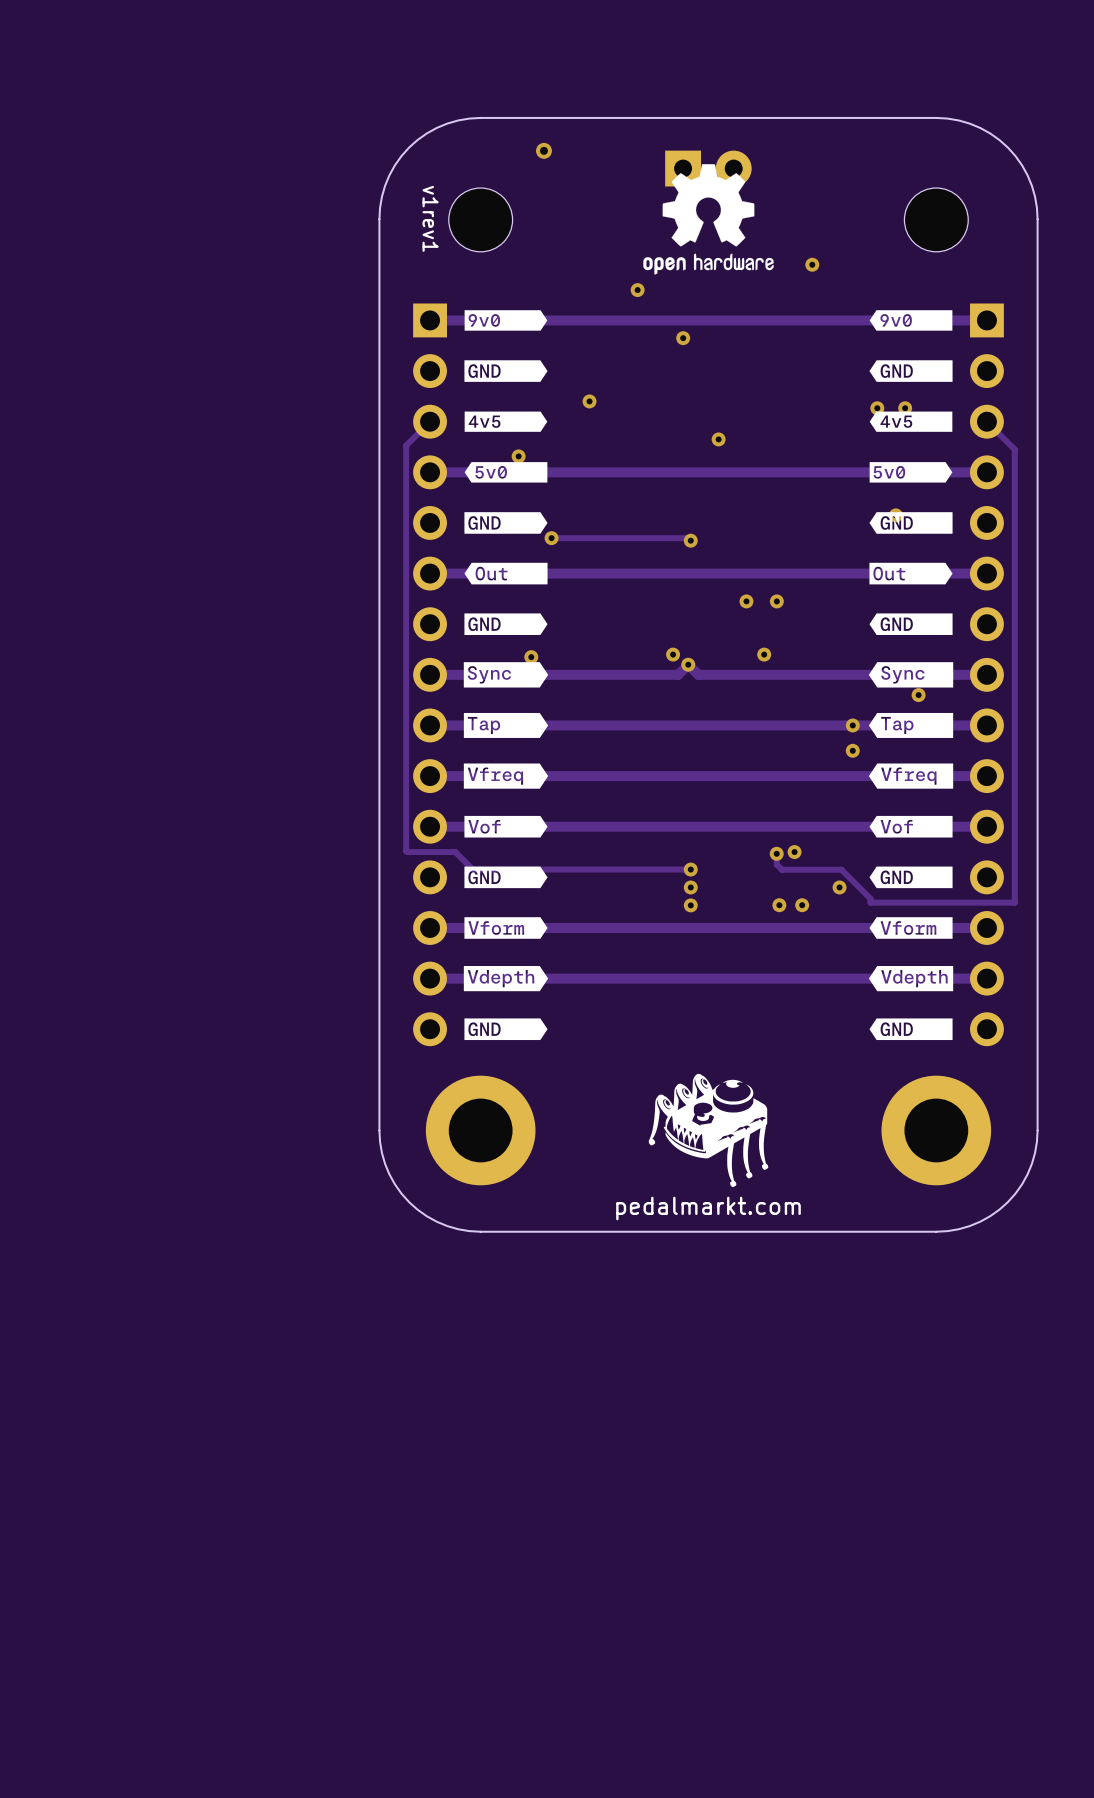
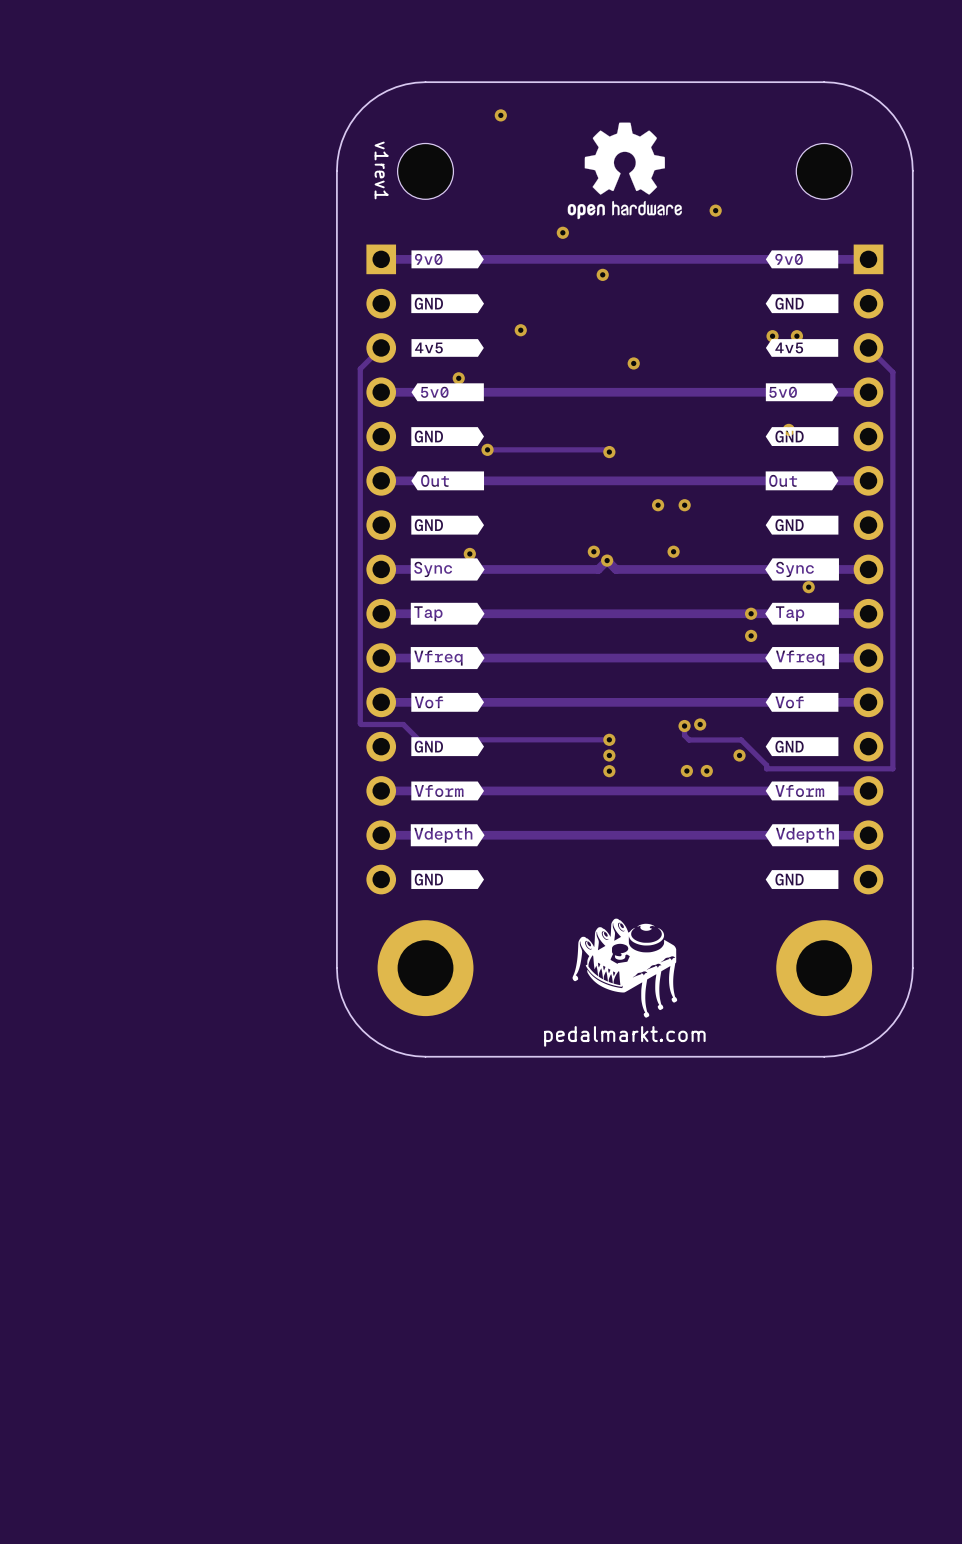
via: (543, 150) -> none
via: none -> (500, 115)
part: (708, 168) -> none

